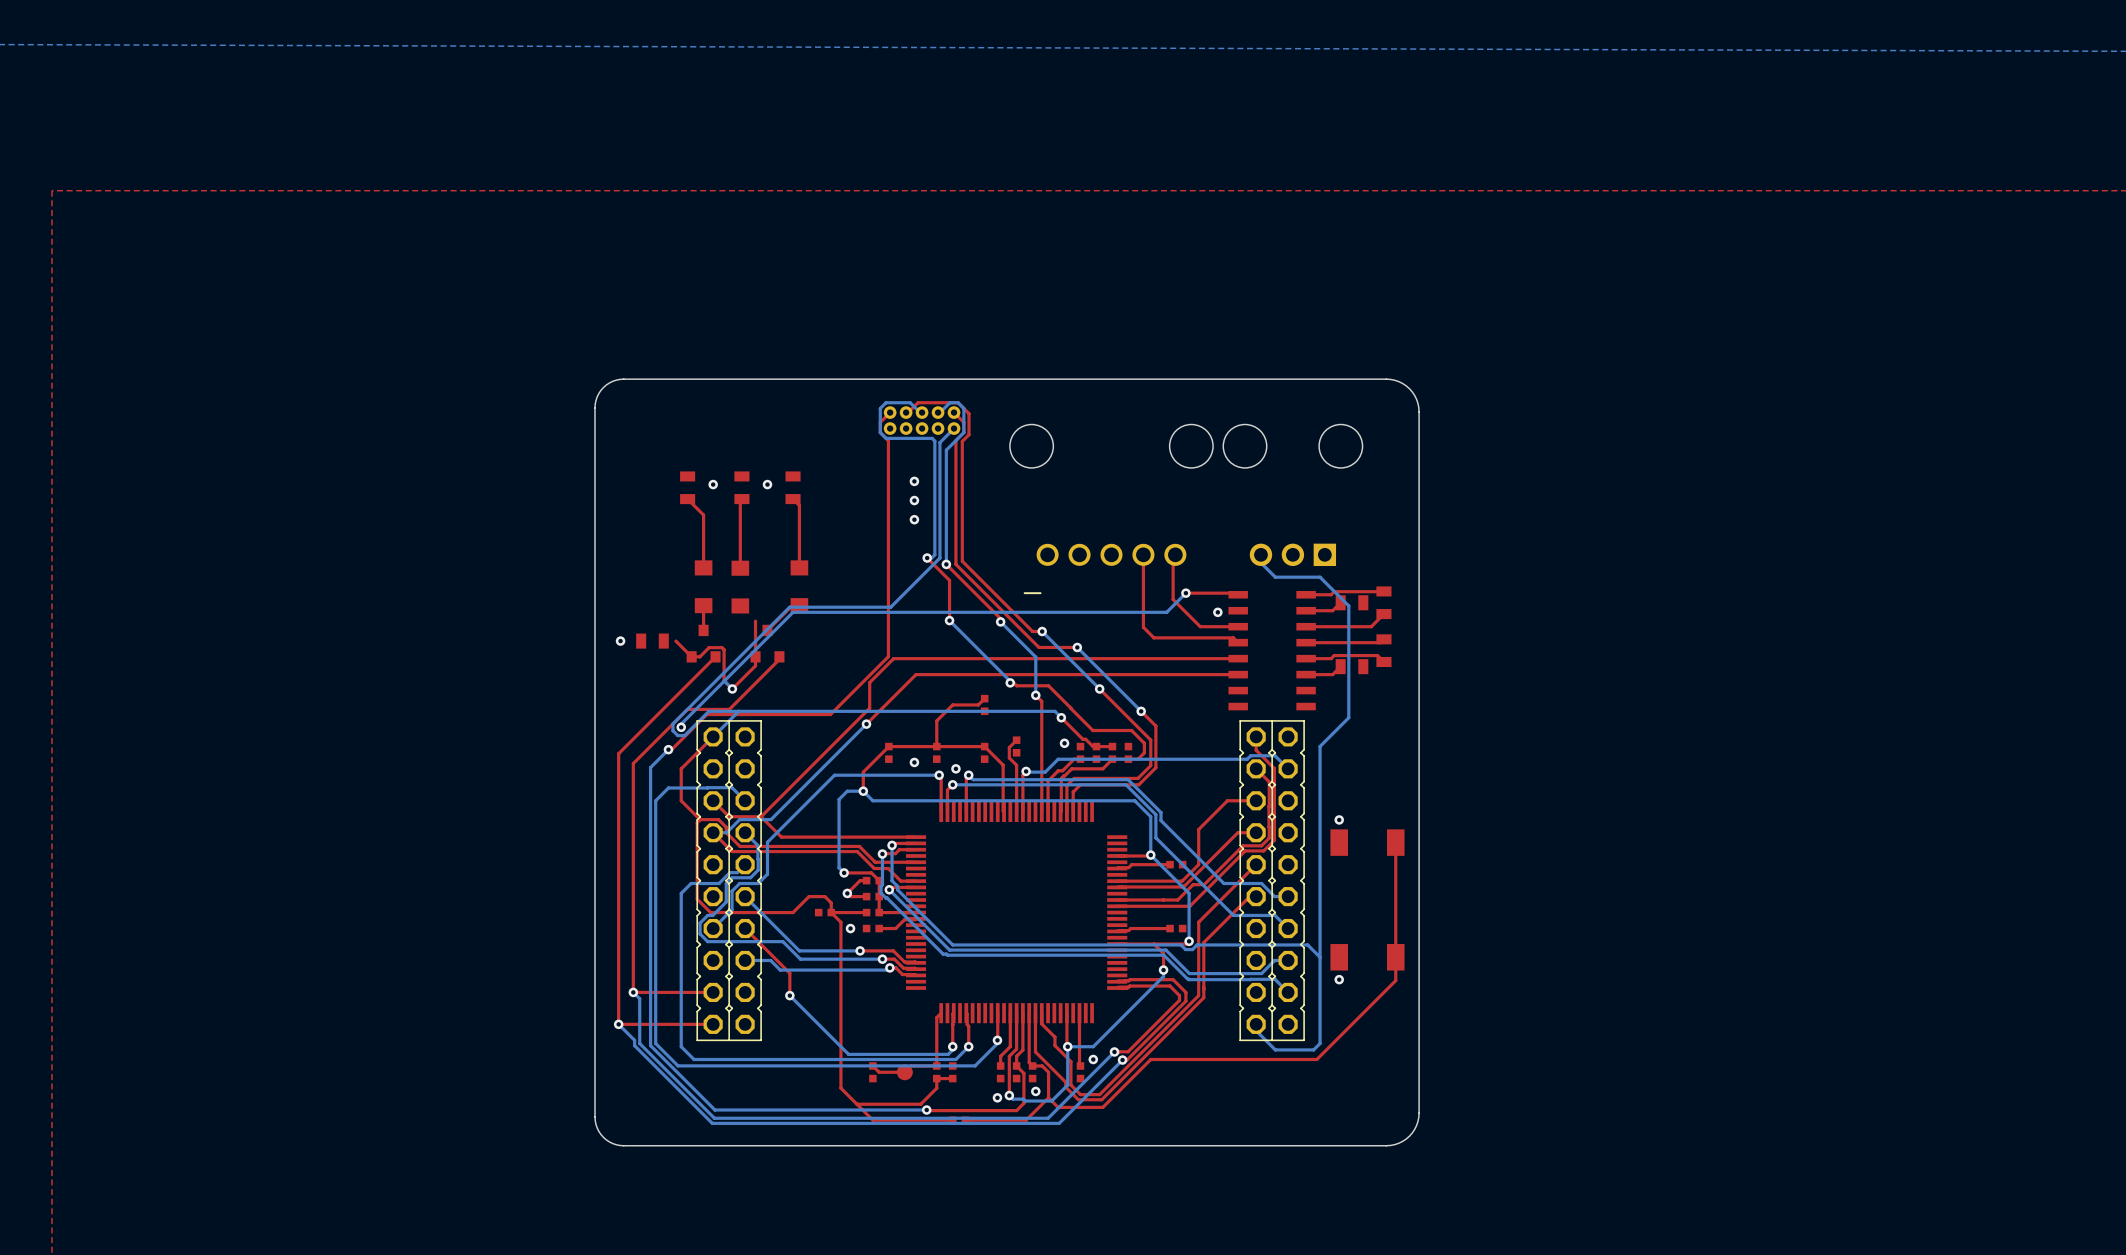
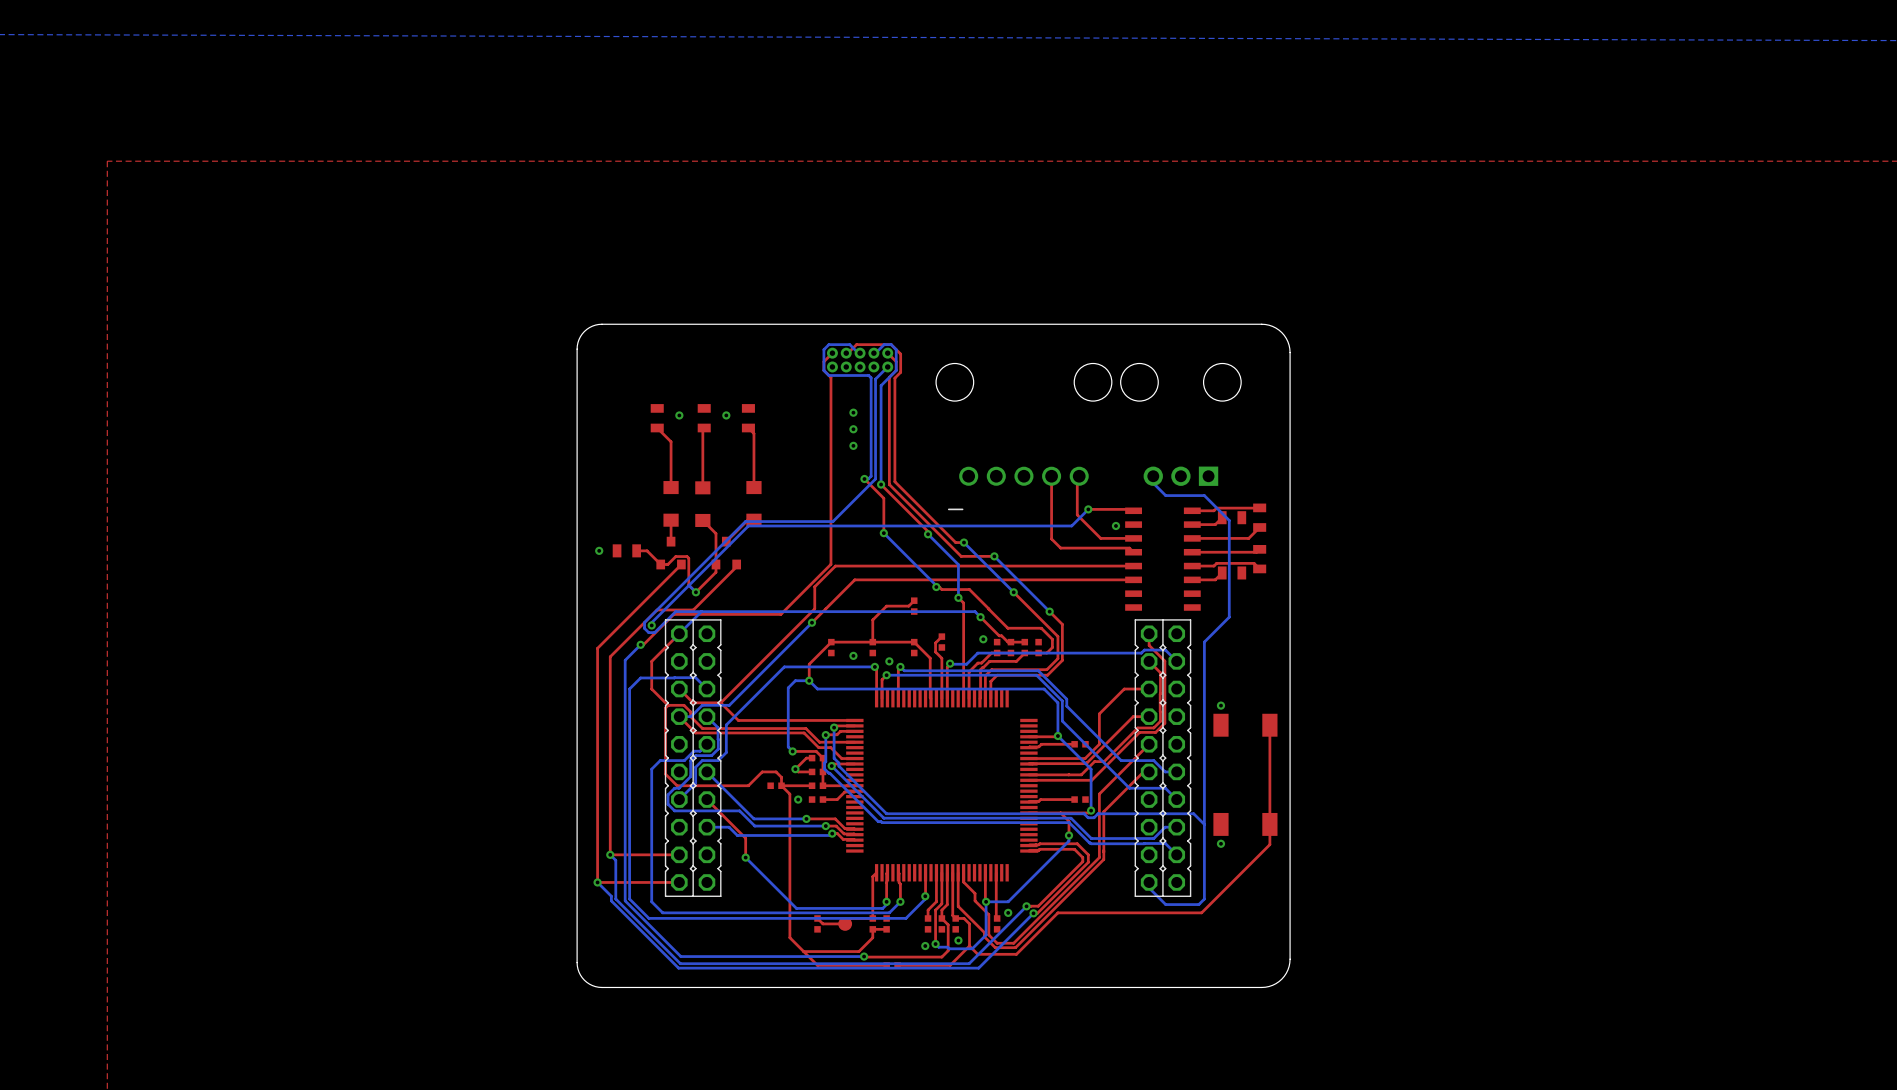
top track: none -> (702, 520) (715, 533)
top track: none -> (647, 550) (636, 550)

